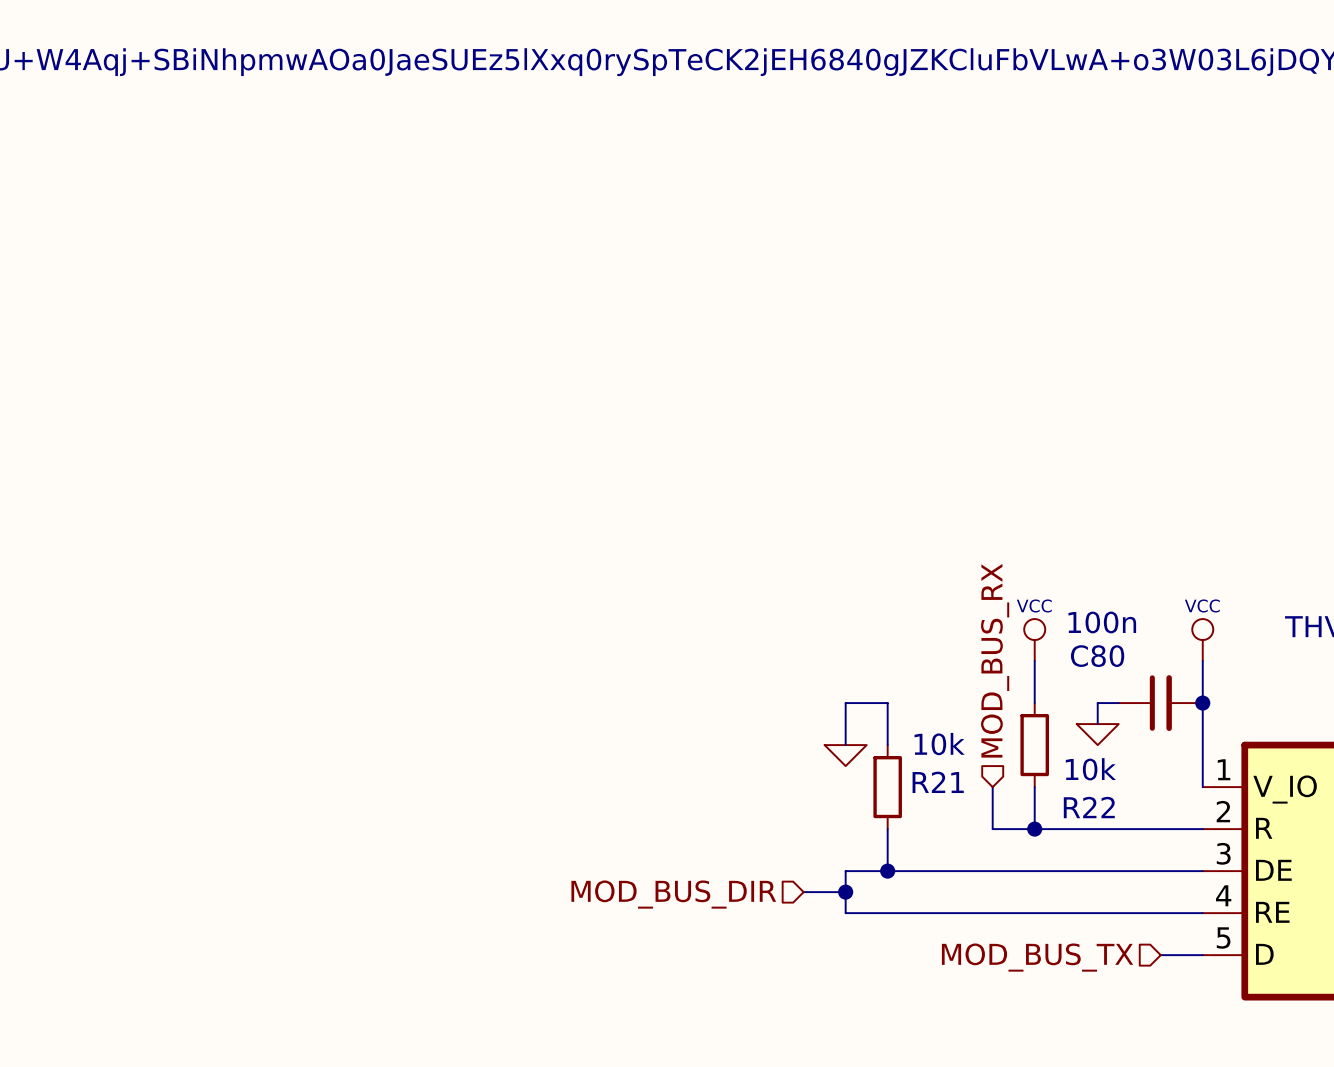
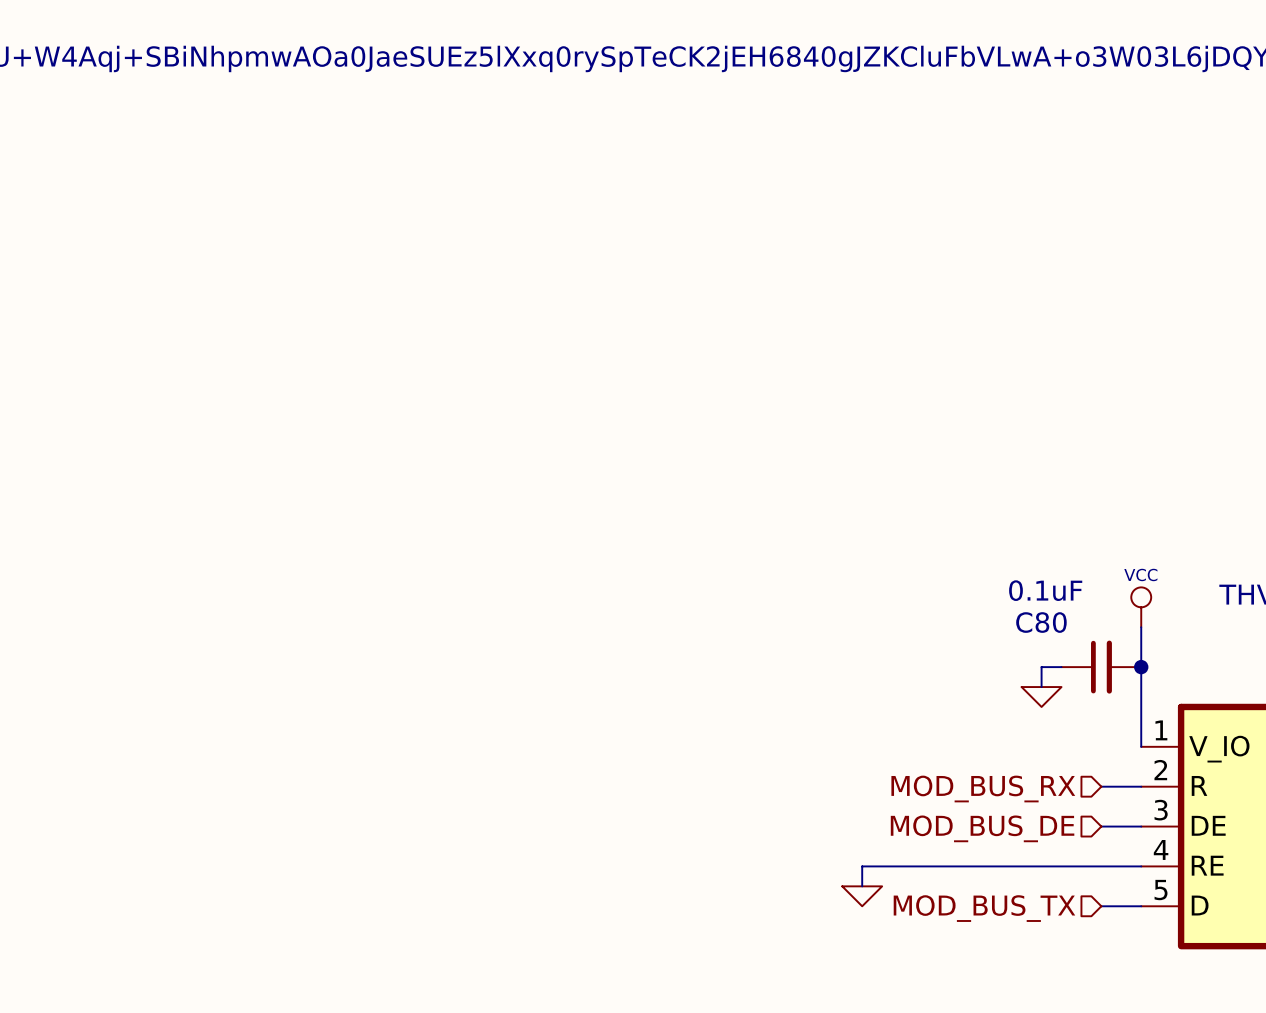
C80 value: 100n (1102, 622) -> 0.1uF (1045, 590)
power symbol: VCC (1034, 640) -> none
hierarchical label rotation: 0° (995, 660) -> 90° counterclockwise (983, 788)
wire: (1034, 661) (1034, 703) -> none
wire: (845, 745) (845, 703) (887, 703) (887, 745) -> none
R22: 10k (1034, 745) -> none
power symbol position: (845, 755) -> (862, 896)
R21: 10k (887, 787) -> none
wire: (992, 787) (992, 829) (1160, 829) -> none
wire: (1034, 787) (1034, 829) -> none
wire: (887, 829) (887, 871) -> none
junction: (1034, 829) -> none
junction: (887, 871) -> none
wire: (1160, 871) (845, 871) (845, 913) (908, 913) -> (862, 886) (862, 866)
hierarchical label: none -> MOD_BUS_DE (982, 828)
wire: (803, 892) (845, 892) -> none
junction: (845, 892) -> none
hierarchical label: MOD_BUS_DIR (673, 894) -> none

